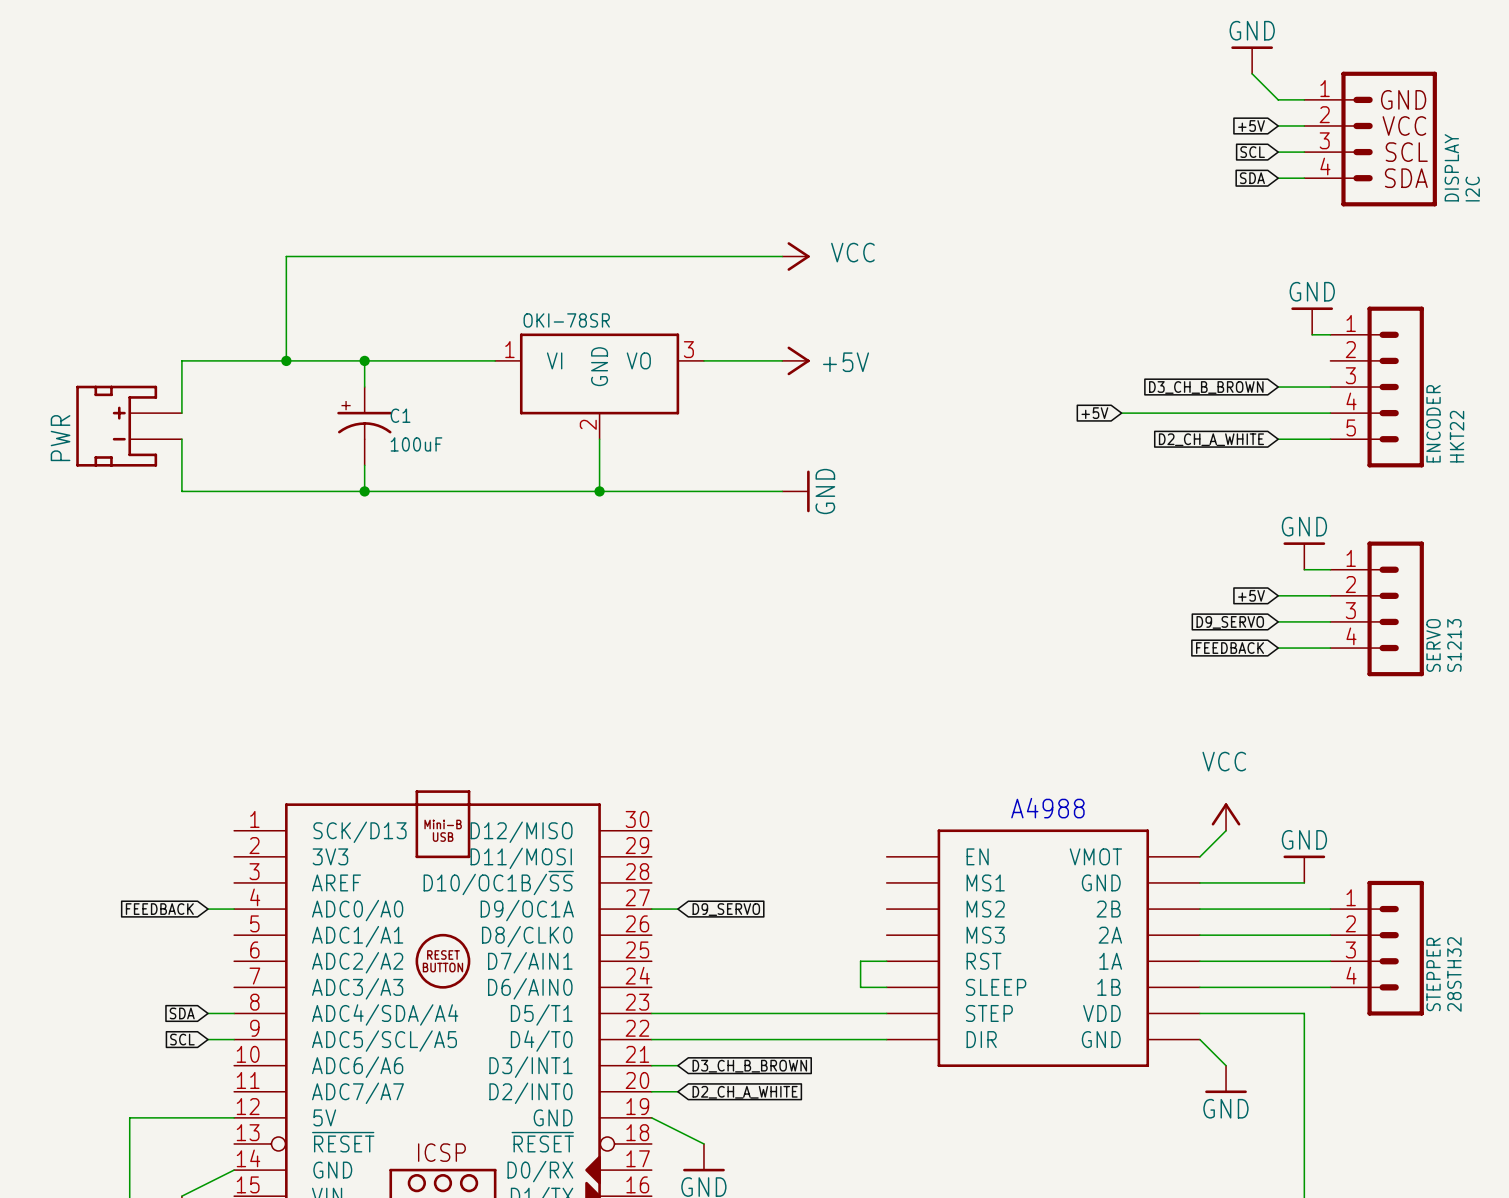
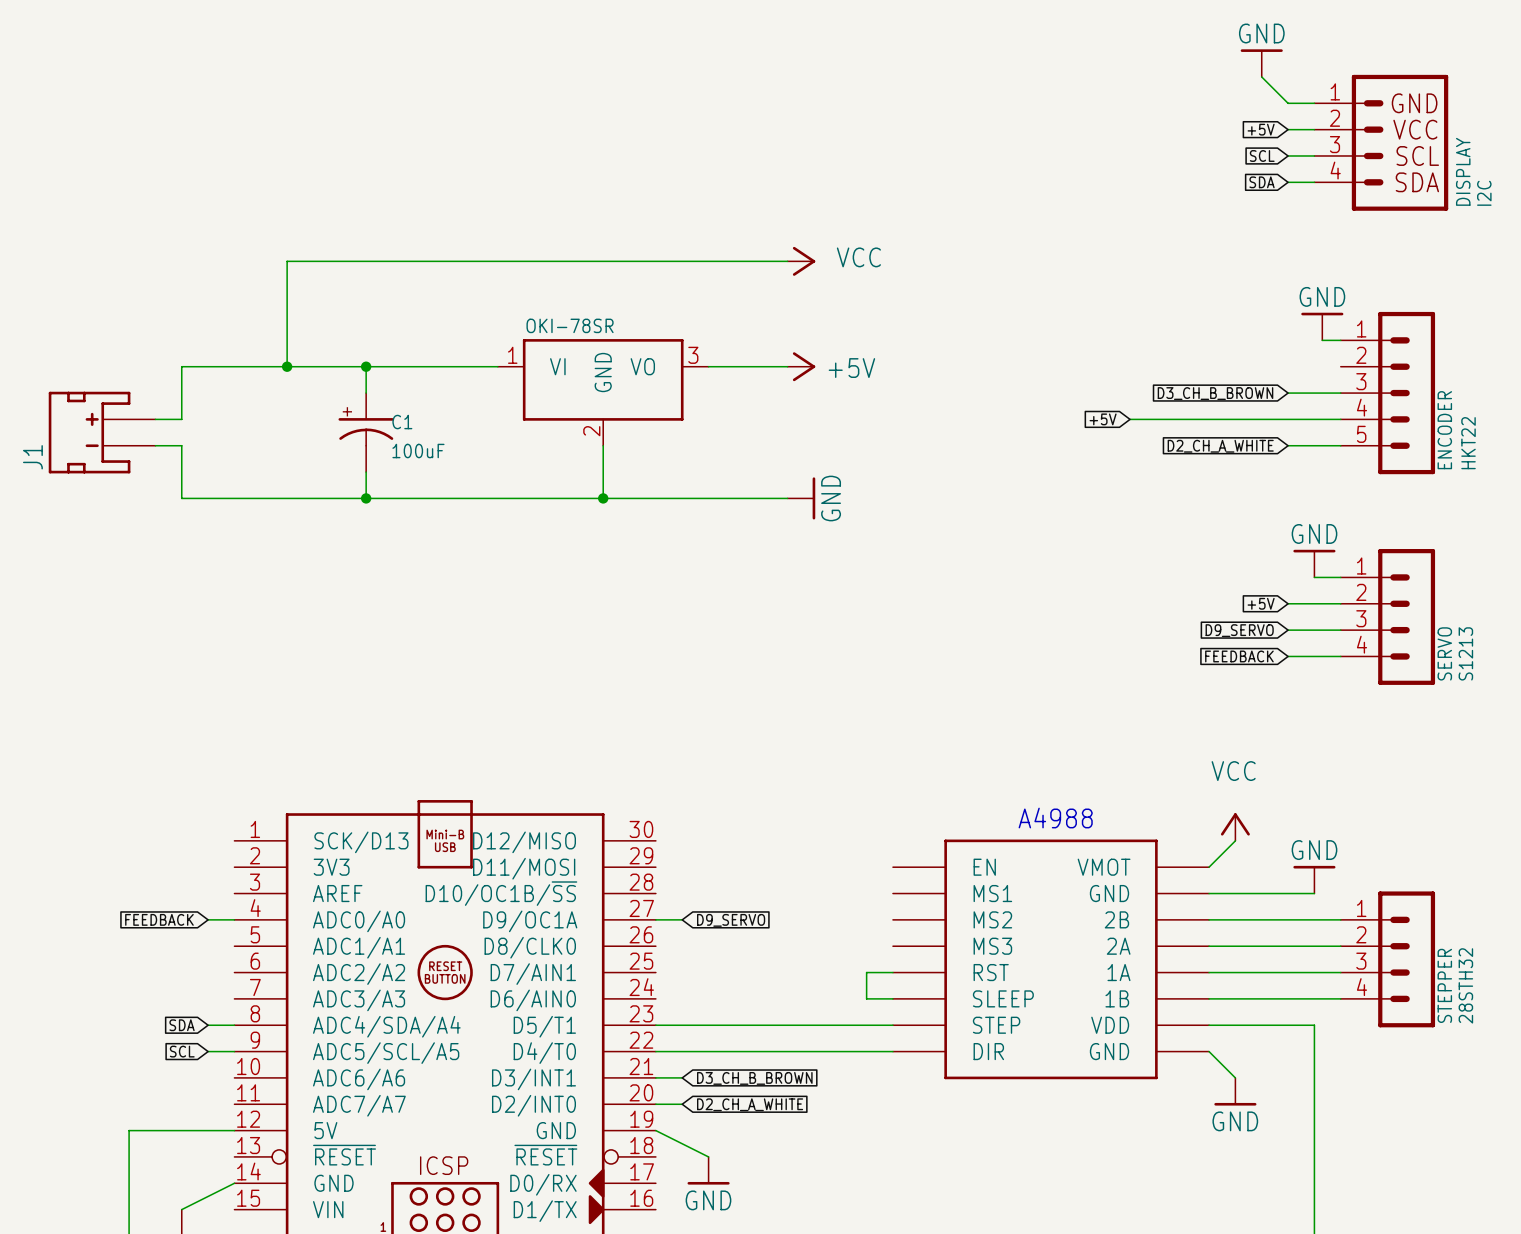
J1: none -> (102, 432)
PWR: (129, 426) -> none

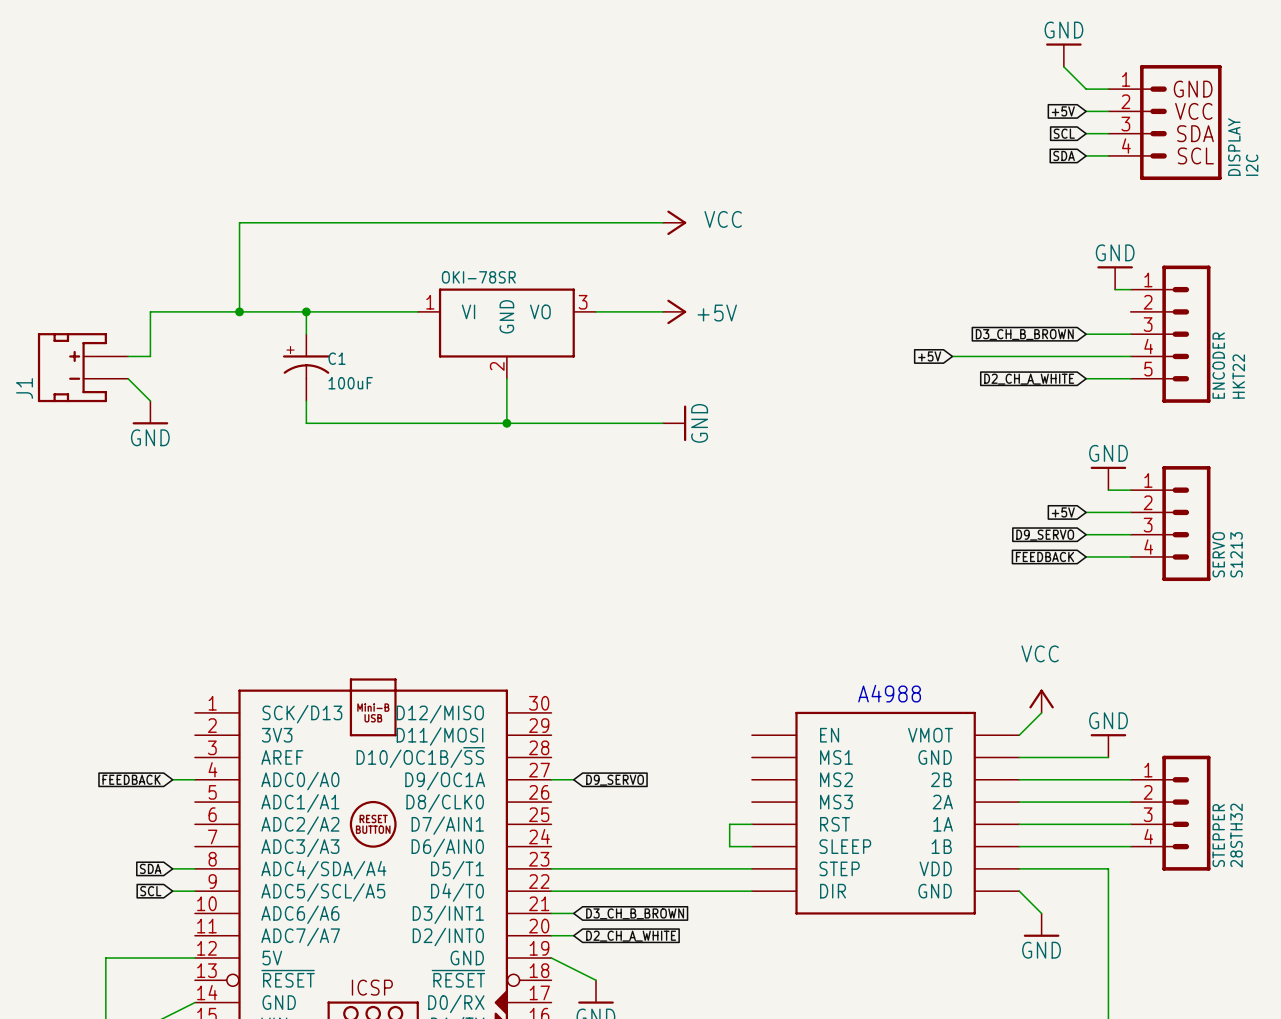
DISPLAY text: SCL (1417, 155) -> SDA (1195, 133)
DISPLAY text: SDA (1417, 182) -> SCL (1195, 155)
wire: (155, 445) (181, 445) (181, 498) (366, 498) -> (128, 378) (150, 401)
power symbol: none -> GND (150, 412)
junction: (366, 498) -> none

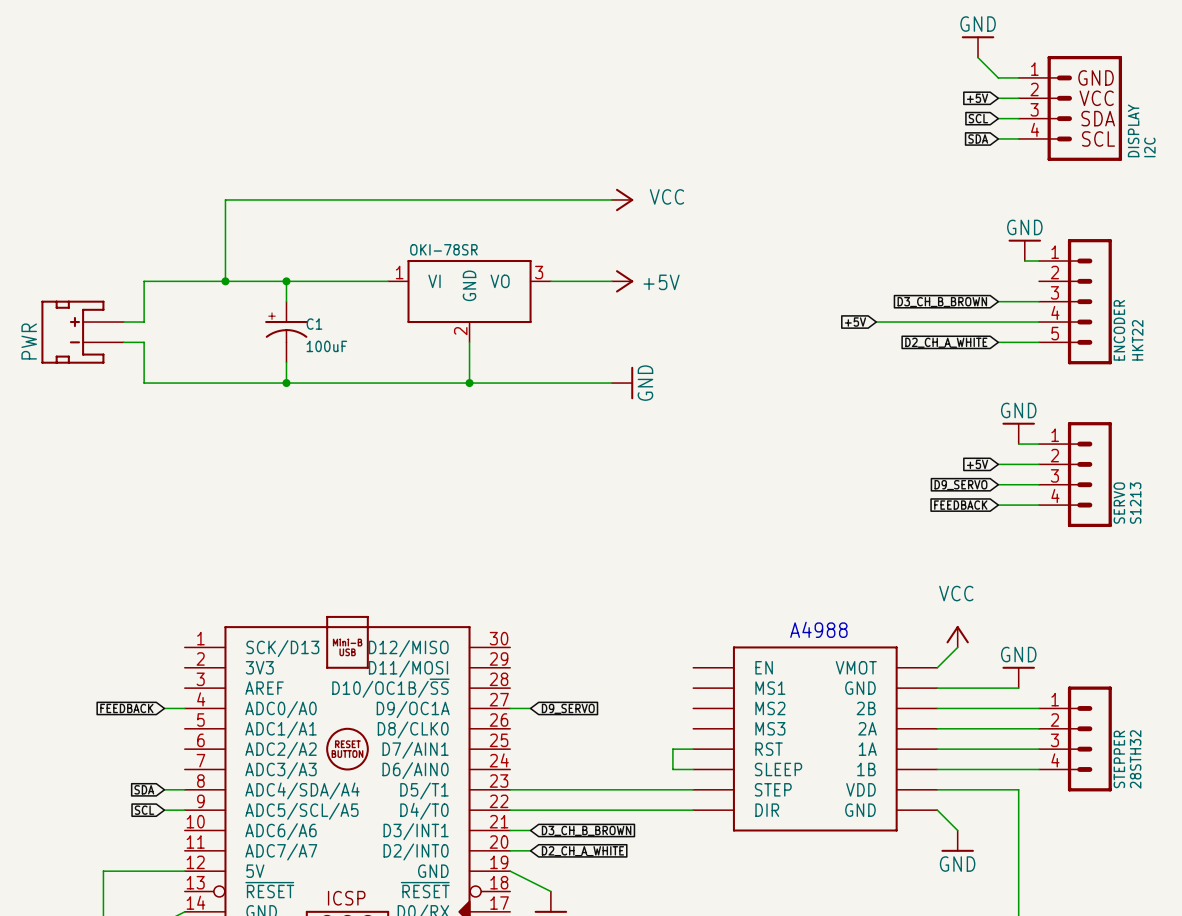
wire: (128, 378) (150, 401) -> (123, 342) (144, 342) (144, 383) (286, 383)
J1 name: J1 (24, 388) -> PWR (29, 341)
power symbol: GND (150, 412) -> none
junction: none -> (286, 383)

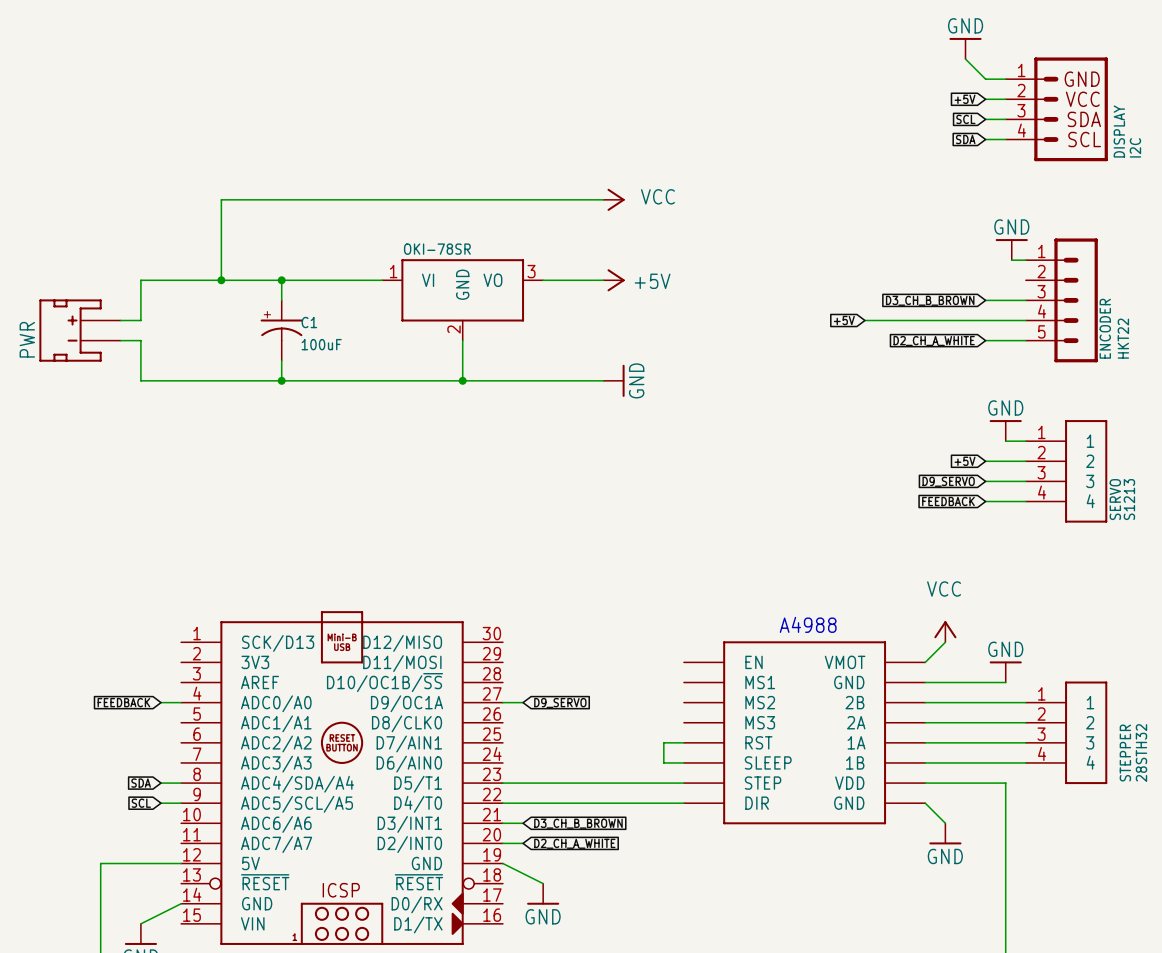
SERVO symbol: [1039, 422, 1112, 528] -> [1025, 420, 1108, 523]
STEPPER symbol: [1039, 686, 1112, 792] -> [1025, 681, 1108, 785]

